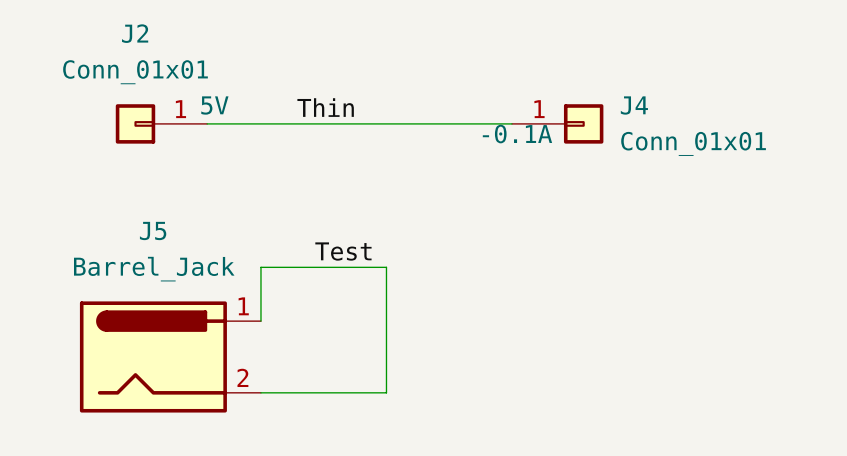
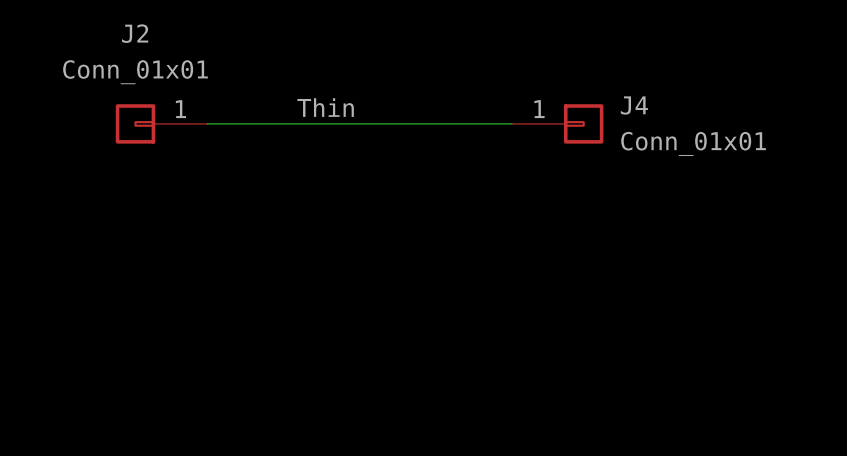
J2 text: 5V (214, 105) -> none
J4 text: -0.1A (517, 134) -> none
label: Test (343, 251) -> none
wire: (260, 321) (260, 267) (386, 267) (386, 392) (260, 392) -> none
J5: Barrel_Jack (170, 356) -> none

